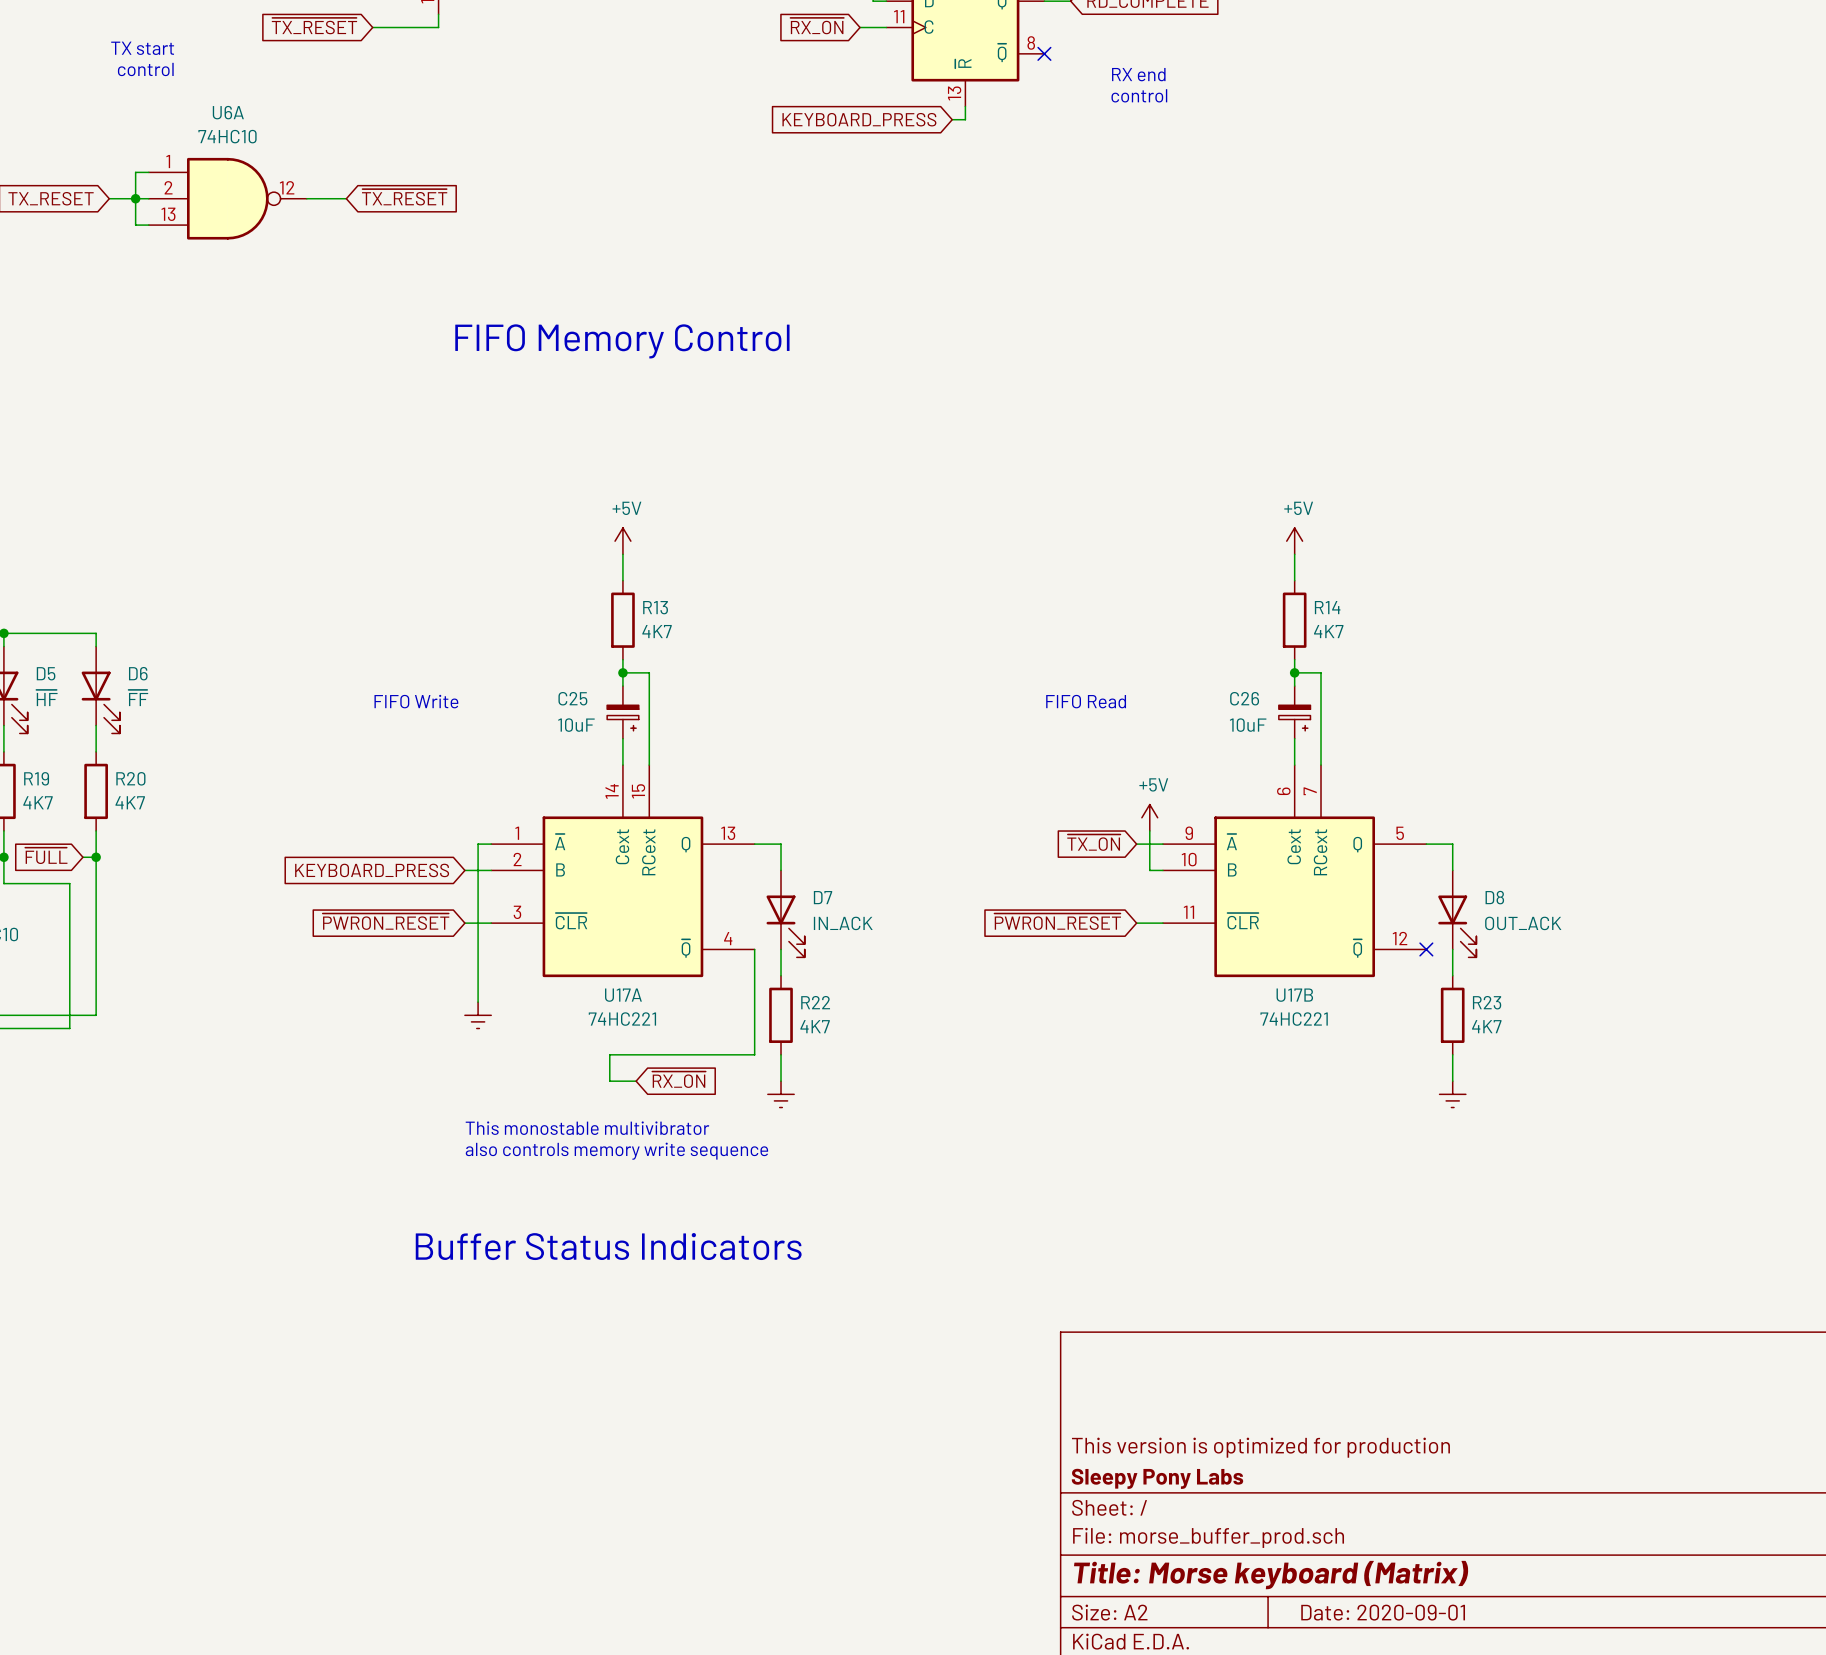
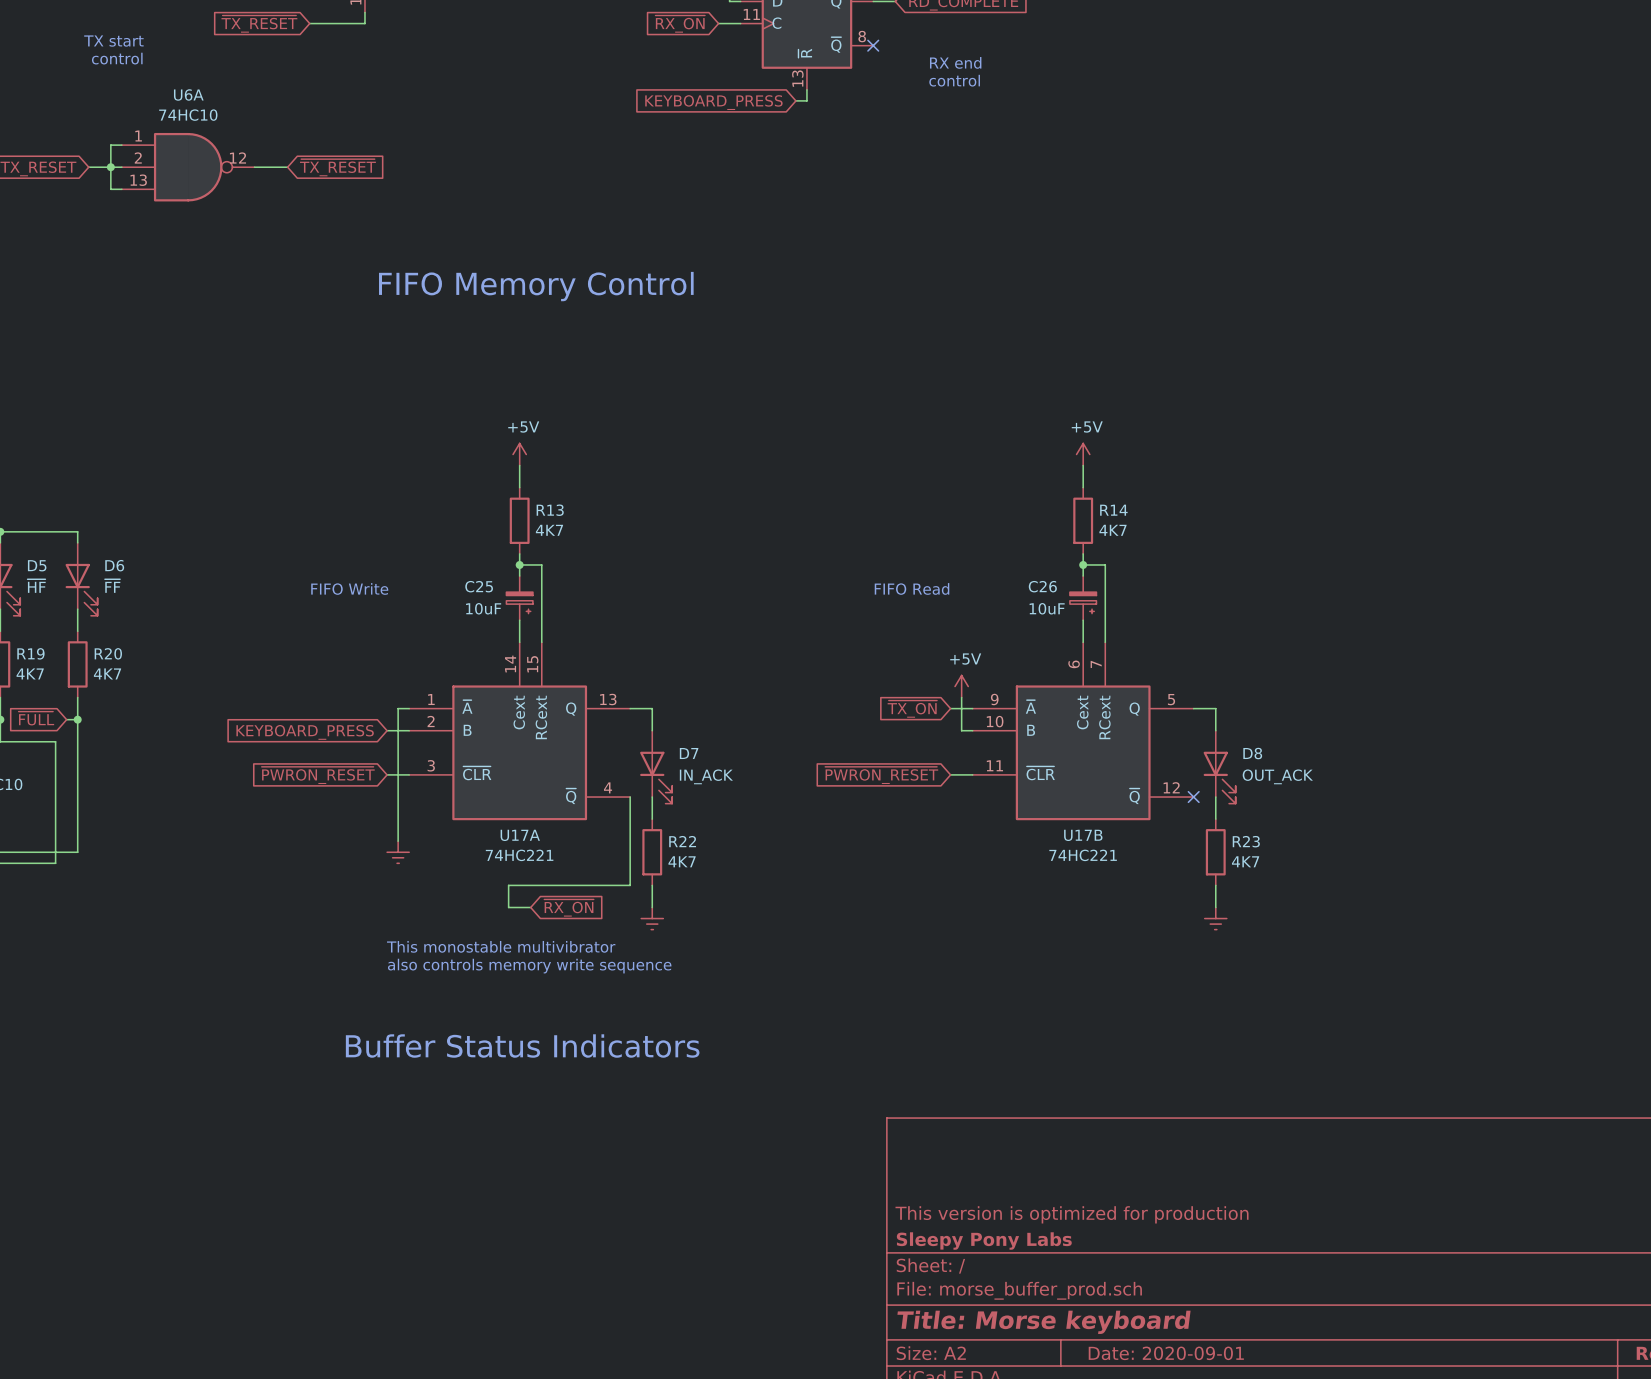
title block: Title: Morse keyboard (Matrix) (1271, 1575) -> Title: Morse keyboard (1044, 1322)

